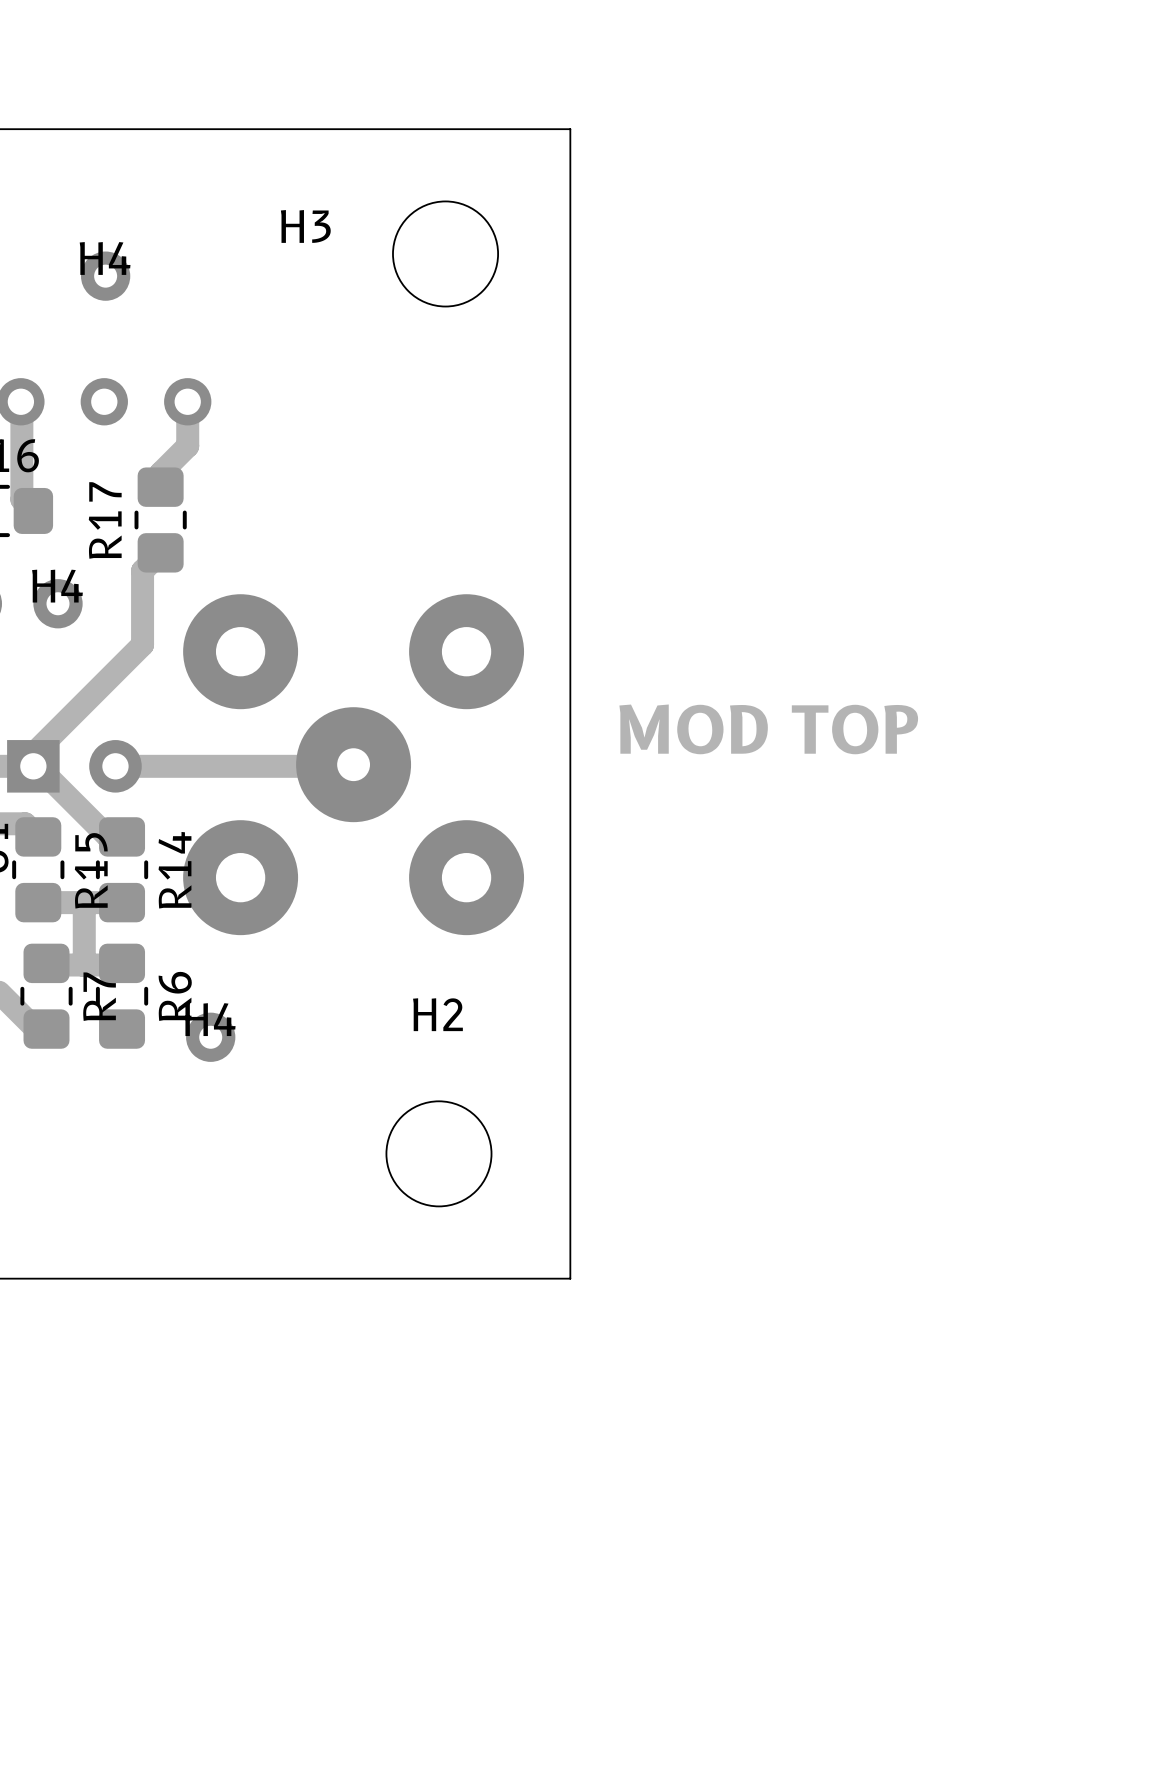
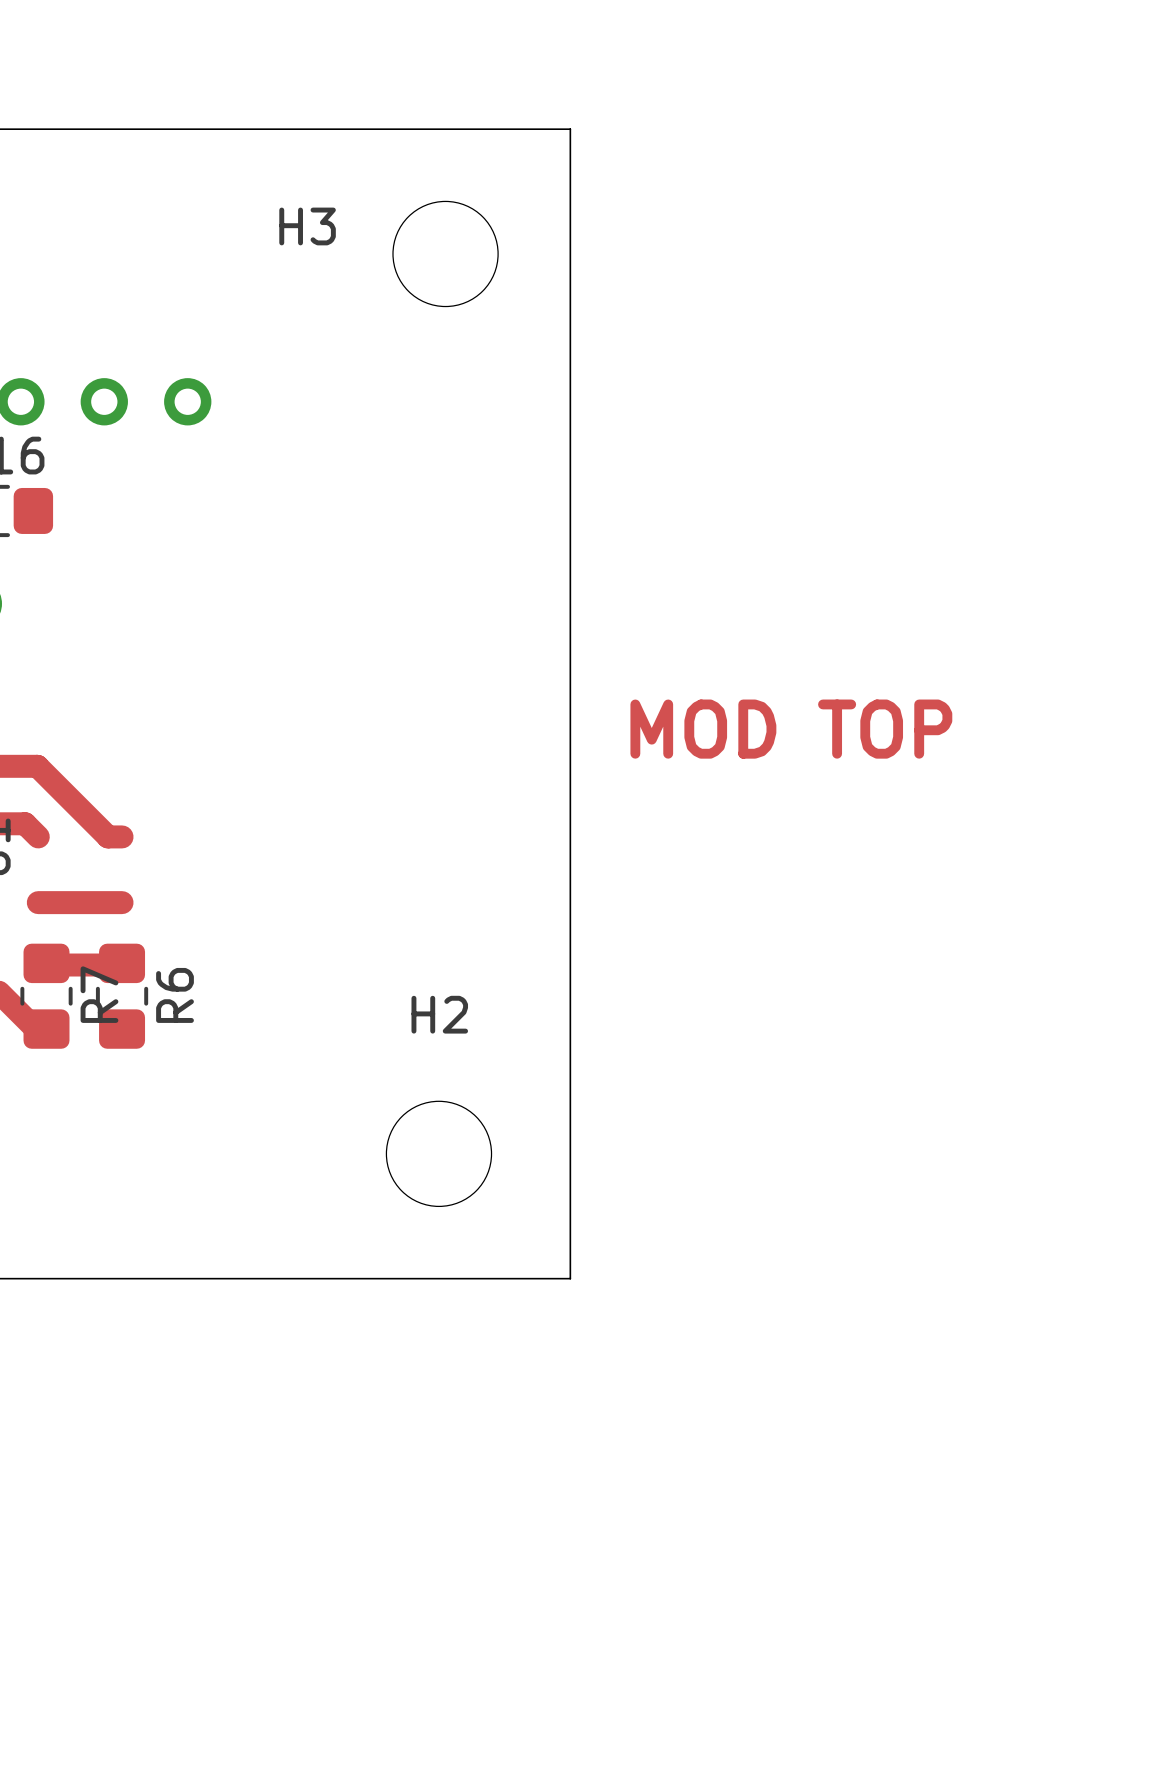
H4: (105, 276) -> none
track: (20, 401) (21, 499) (33, 510) -> none
track: (187, 401) (187, 446) (160, 473) (160, 487) -> none
R17: (160, 520) -> none
track: (160, 552) (142, 570) (142, 644) (33, 754) (33, 766) -> none
H4: (58, 603) -> none
track: (353, 764) (351, 766) (115, 766) -> none
part: (353, 764) -> none
part: (74, 766) -> none
R15: (38, 869) -> none
R14: (122, 869) -> none
track: (84, 902) (84, 963) (82, 965) -> none
H4: (210, 1037) -> none

